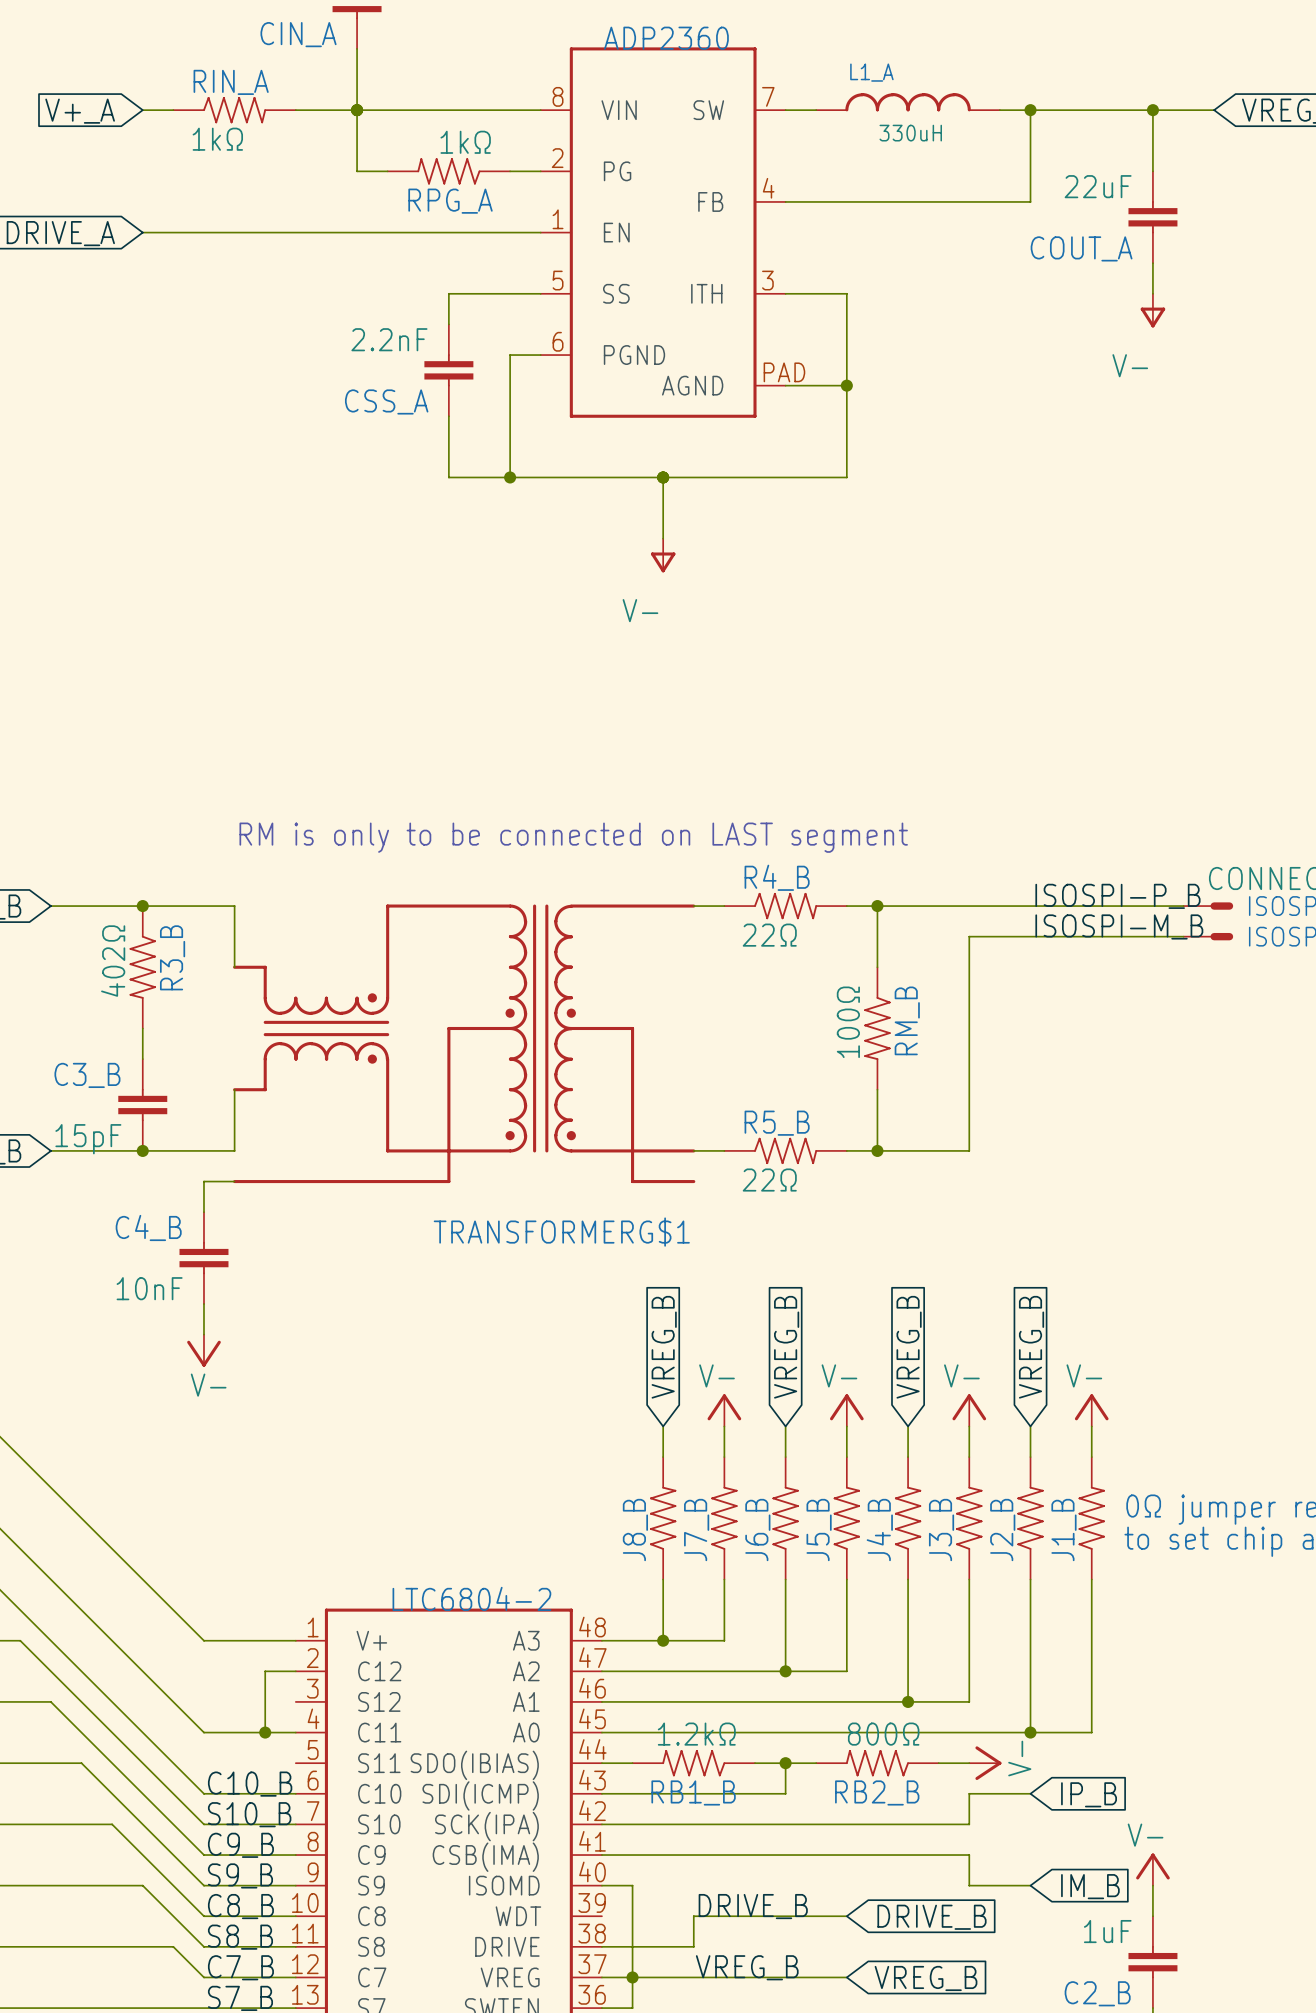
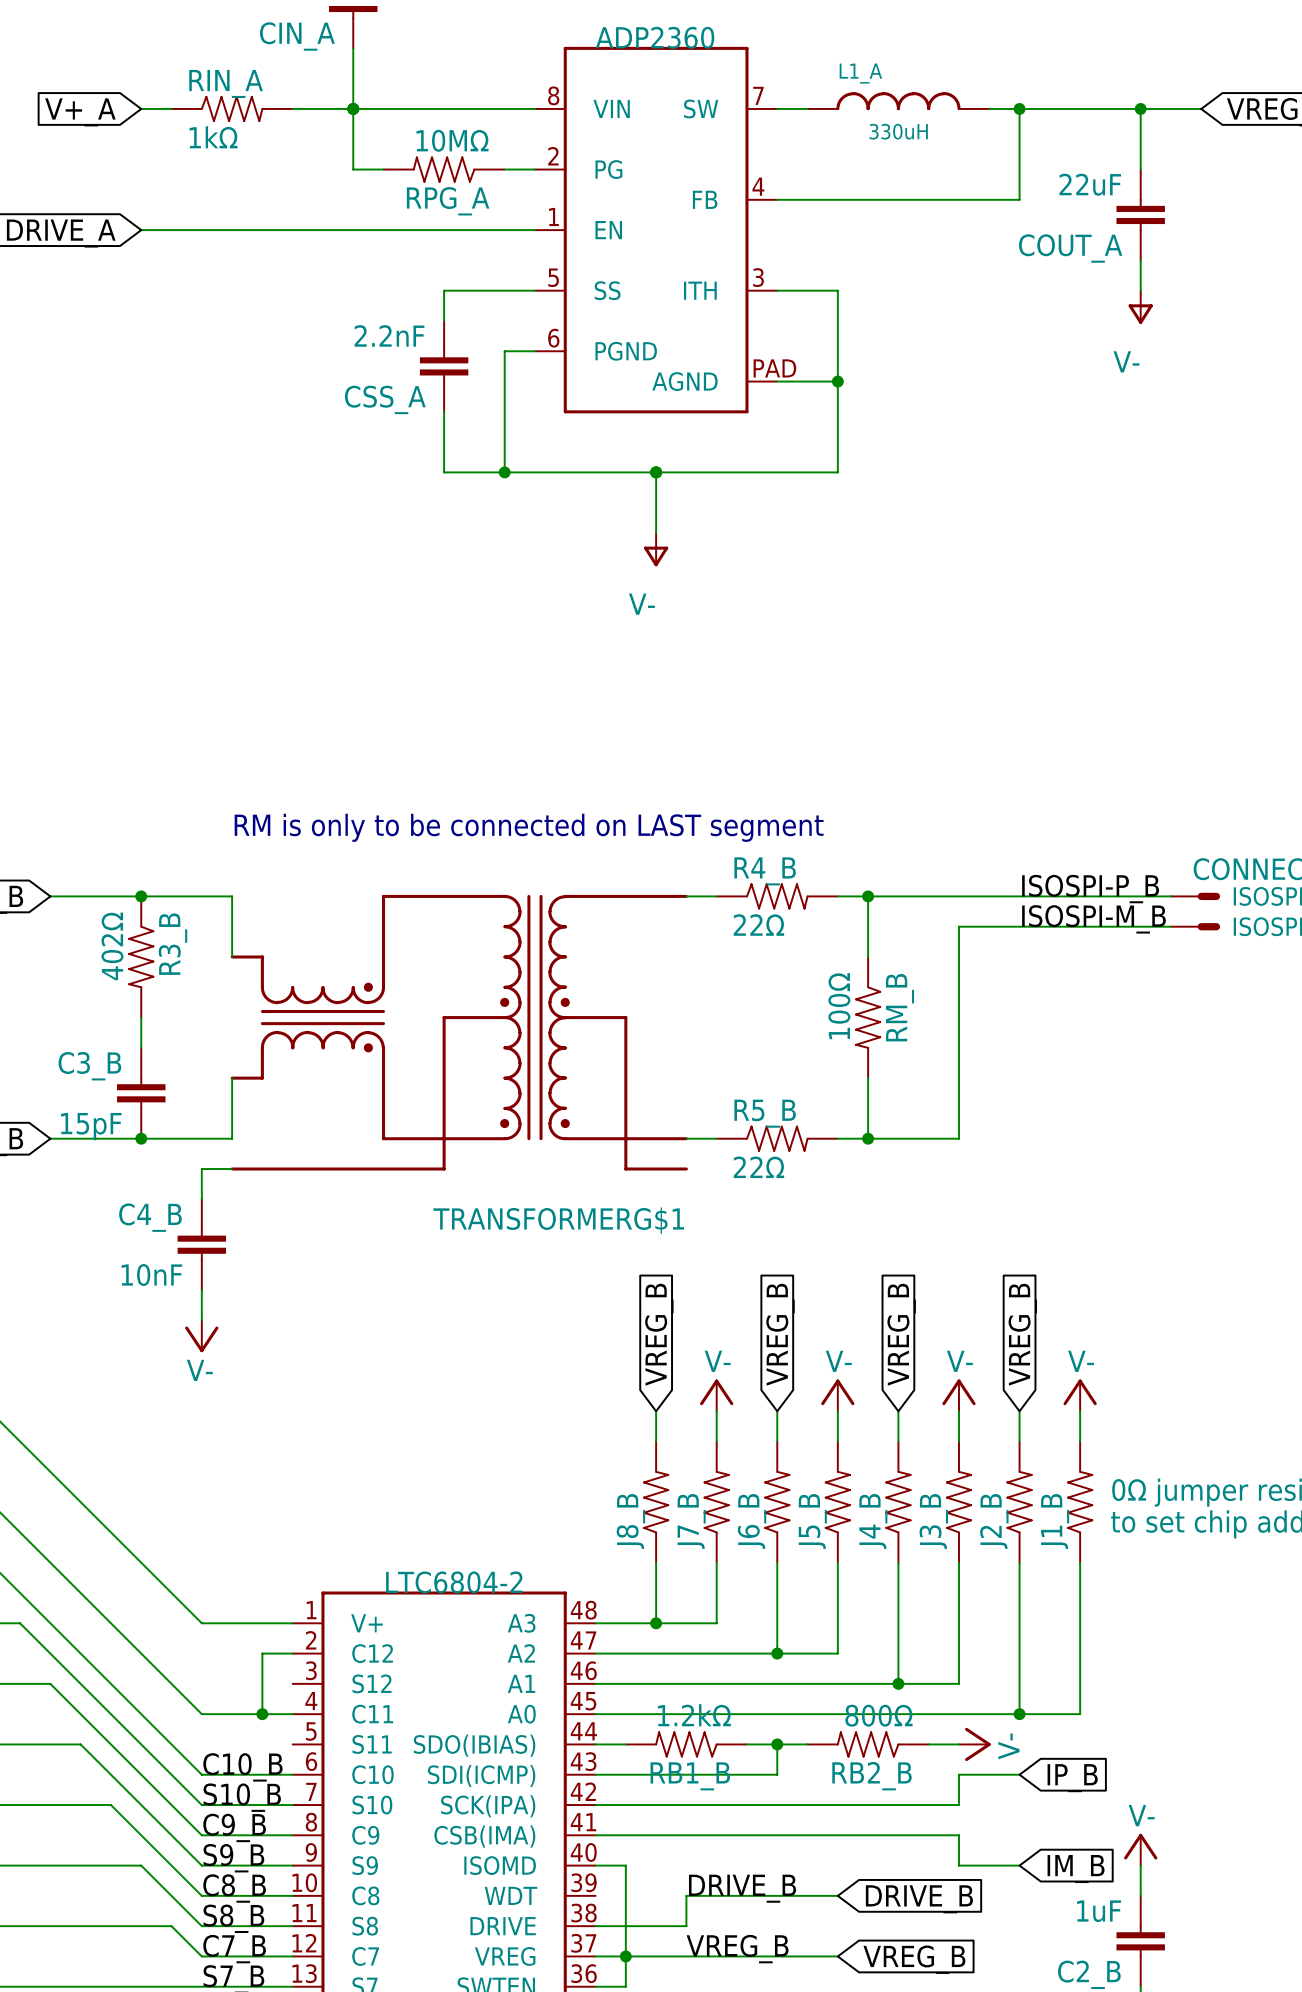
RPG_A value: 1kΩ (465, 142) -> 10MΩ (452, 140)

